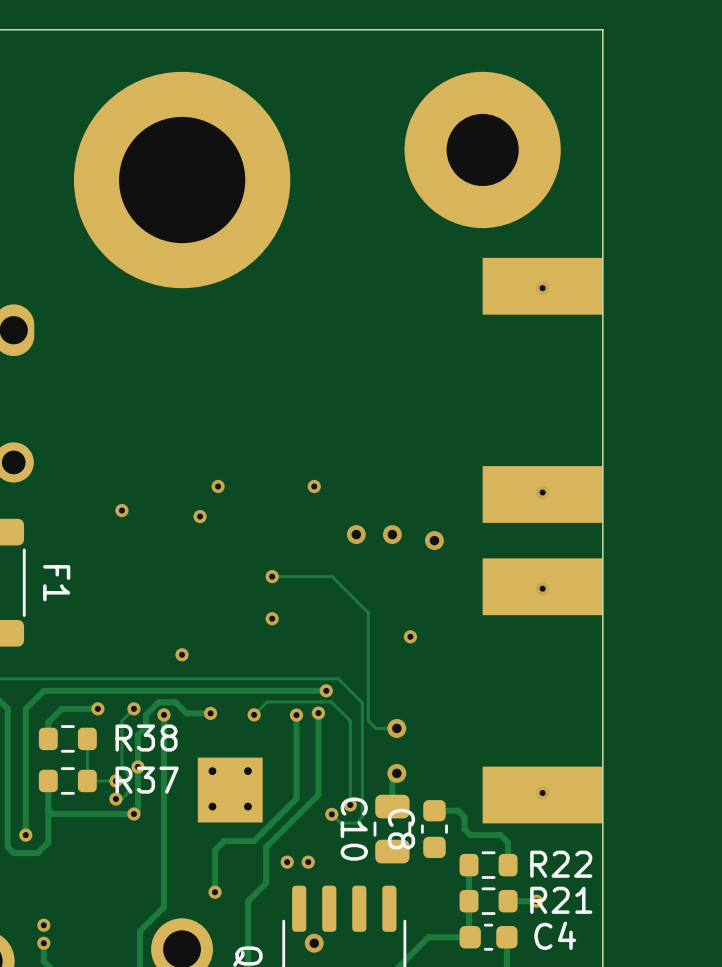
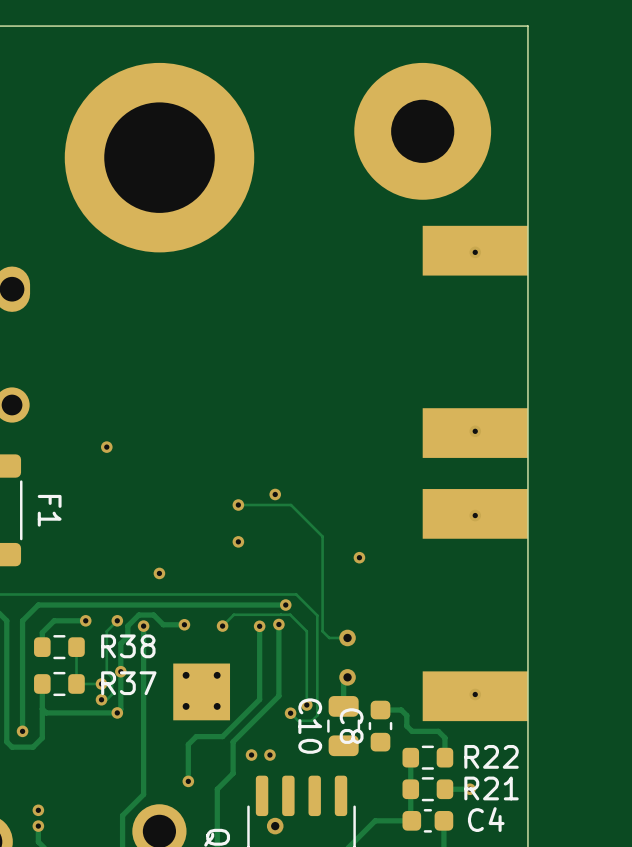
via: (218, 486) -> none
via: (314, 486) -> none
via: (200, 516) -> none
via: (356, 534) -> none
via: (392, 534) -> none
via: (434, 540) -> none
via: none -> (275, 494)

